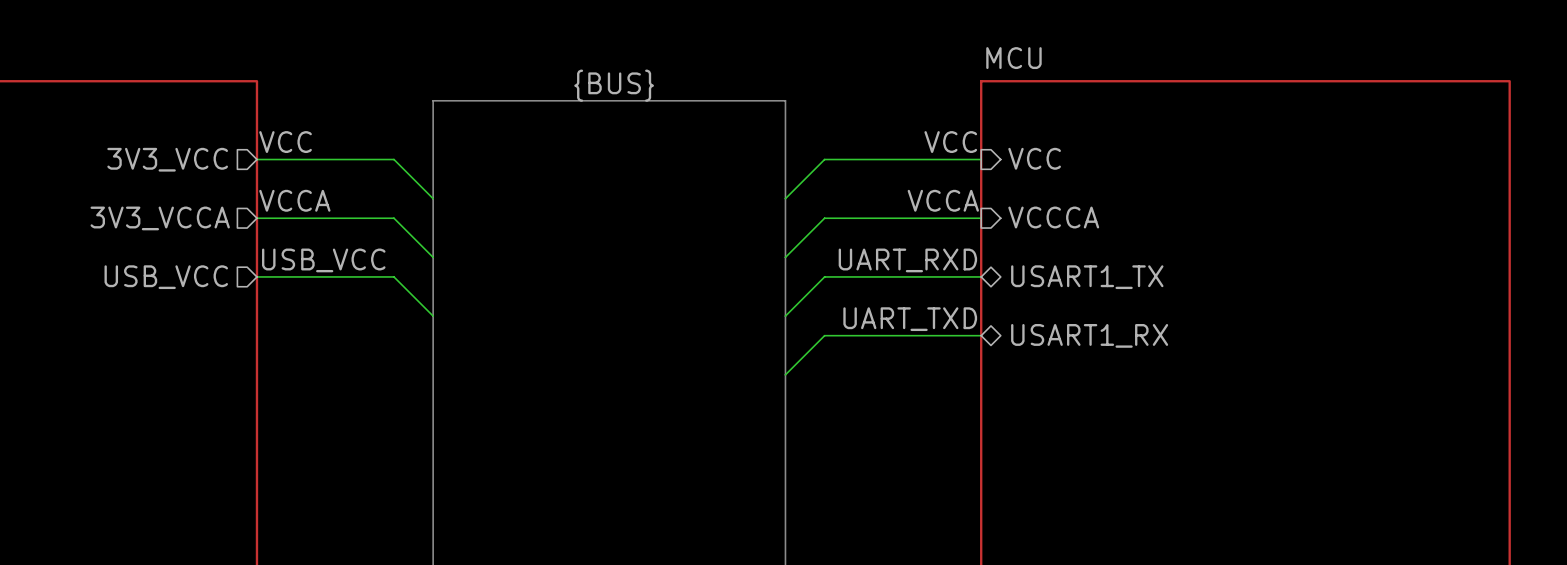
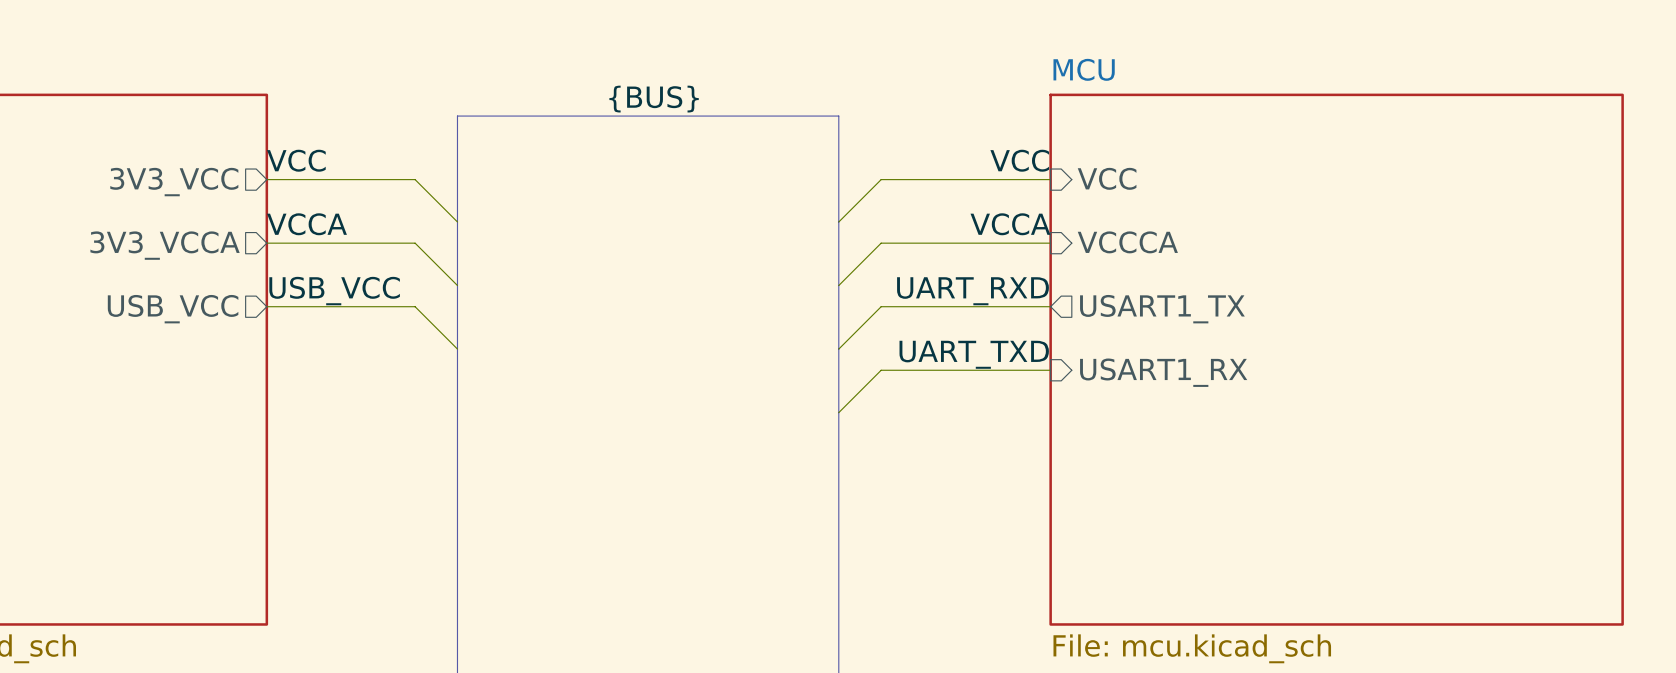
sheet pin shape: bidirectional (1087, 277) -> output (1162, 309)
sheet pin shape: bidirectional (1089, 335) -> input (1163, 372)

